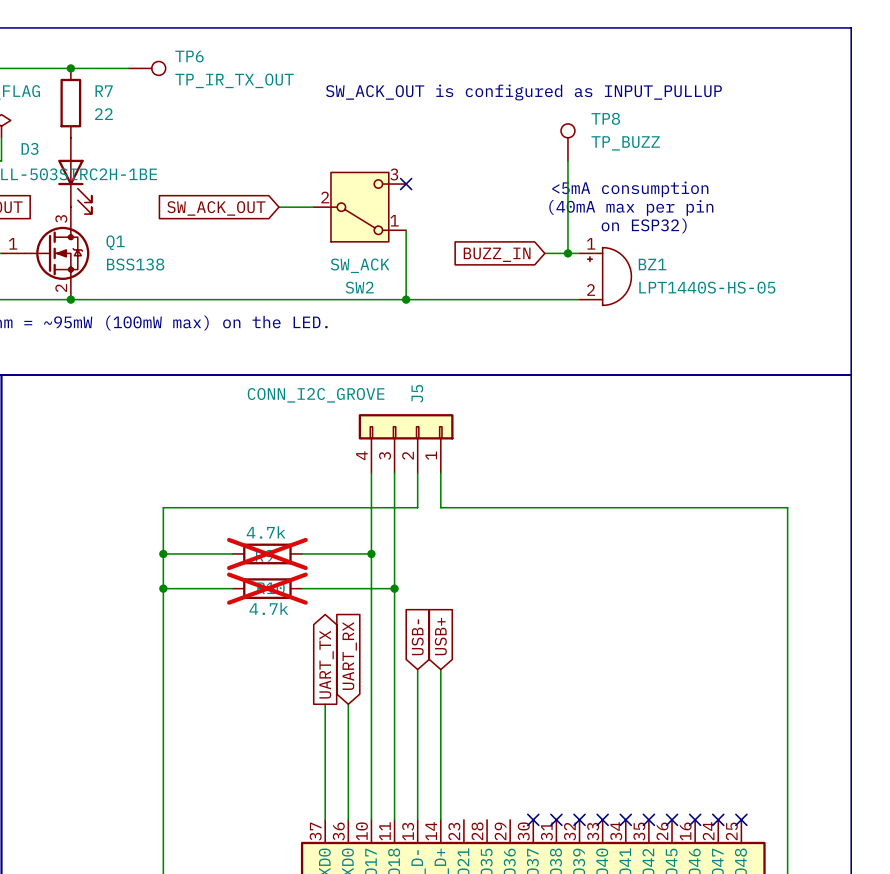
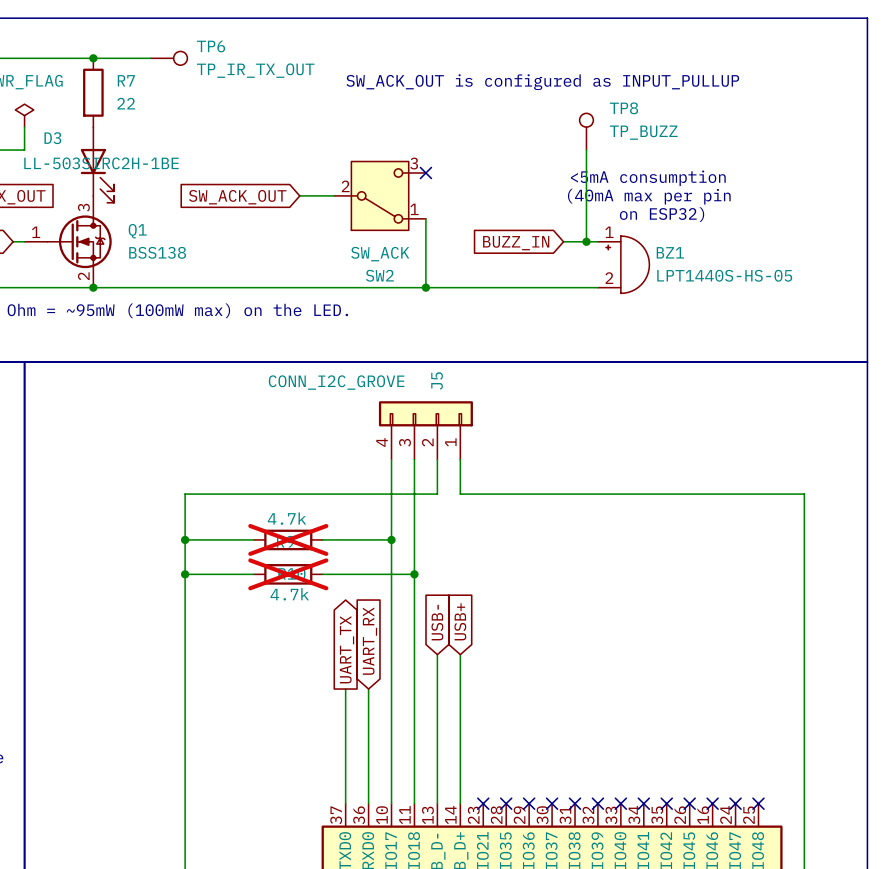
no-connect mark: none -> (483, 803)
no-connect mark: none -> (506, 803)
no-connect mark: none -> (529, 803)

